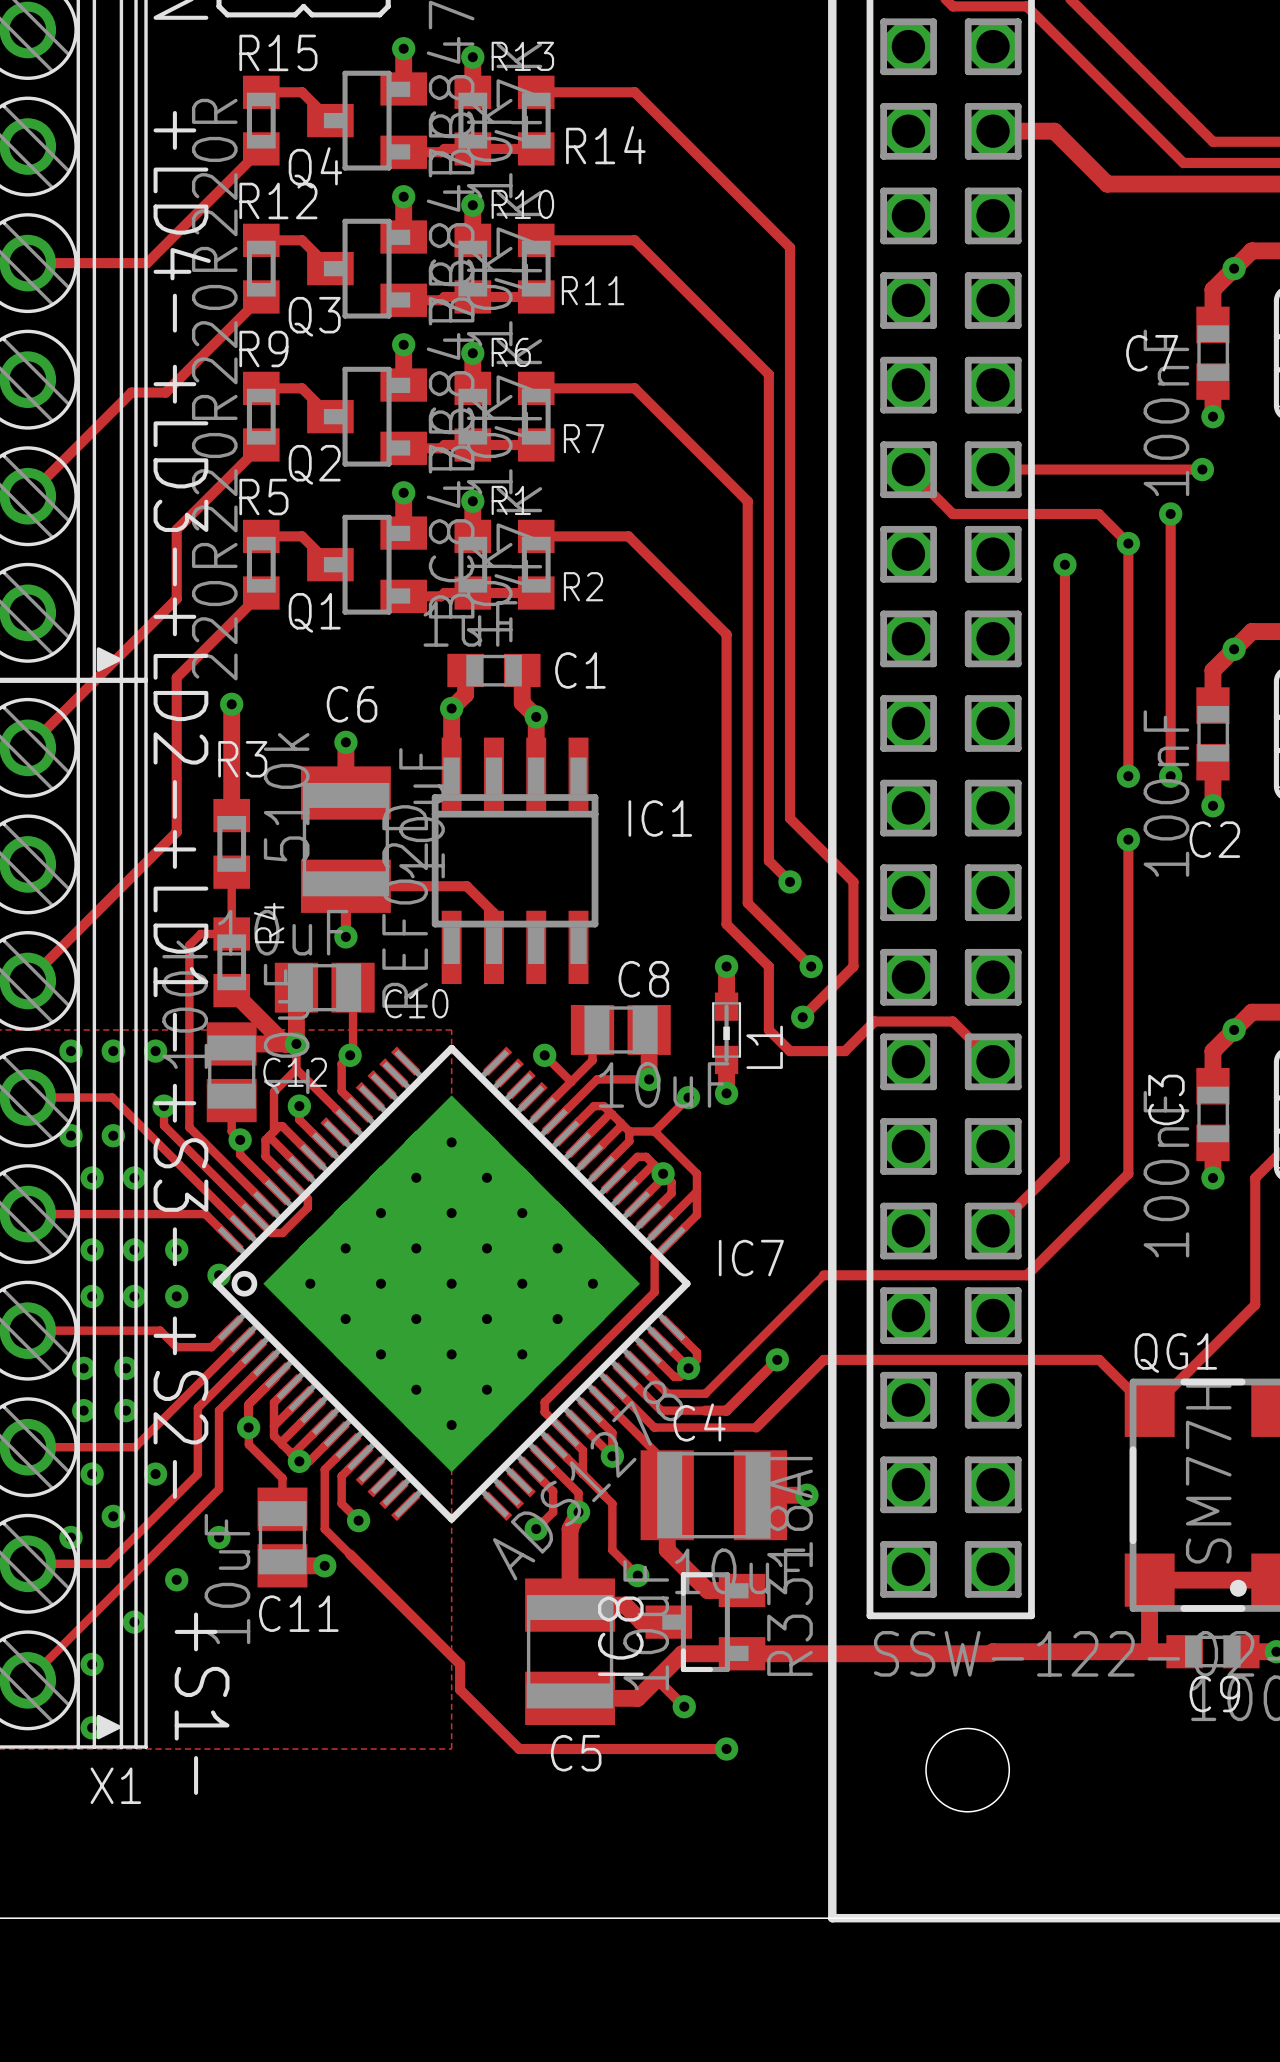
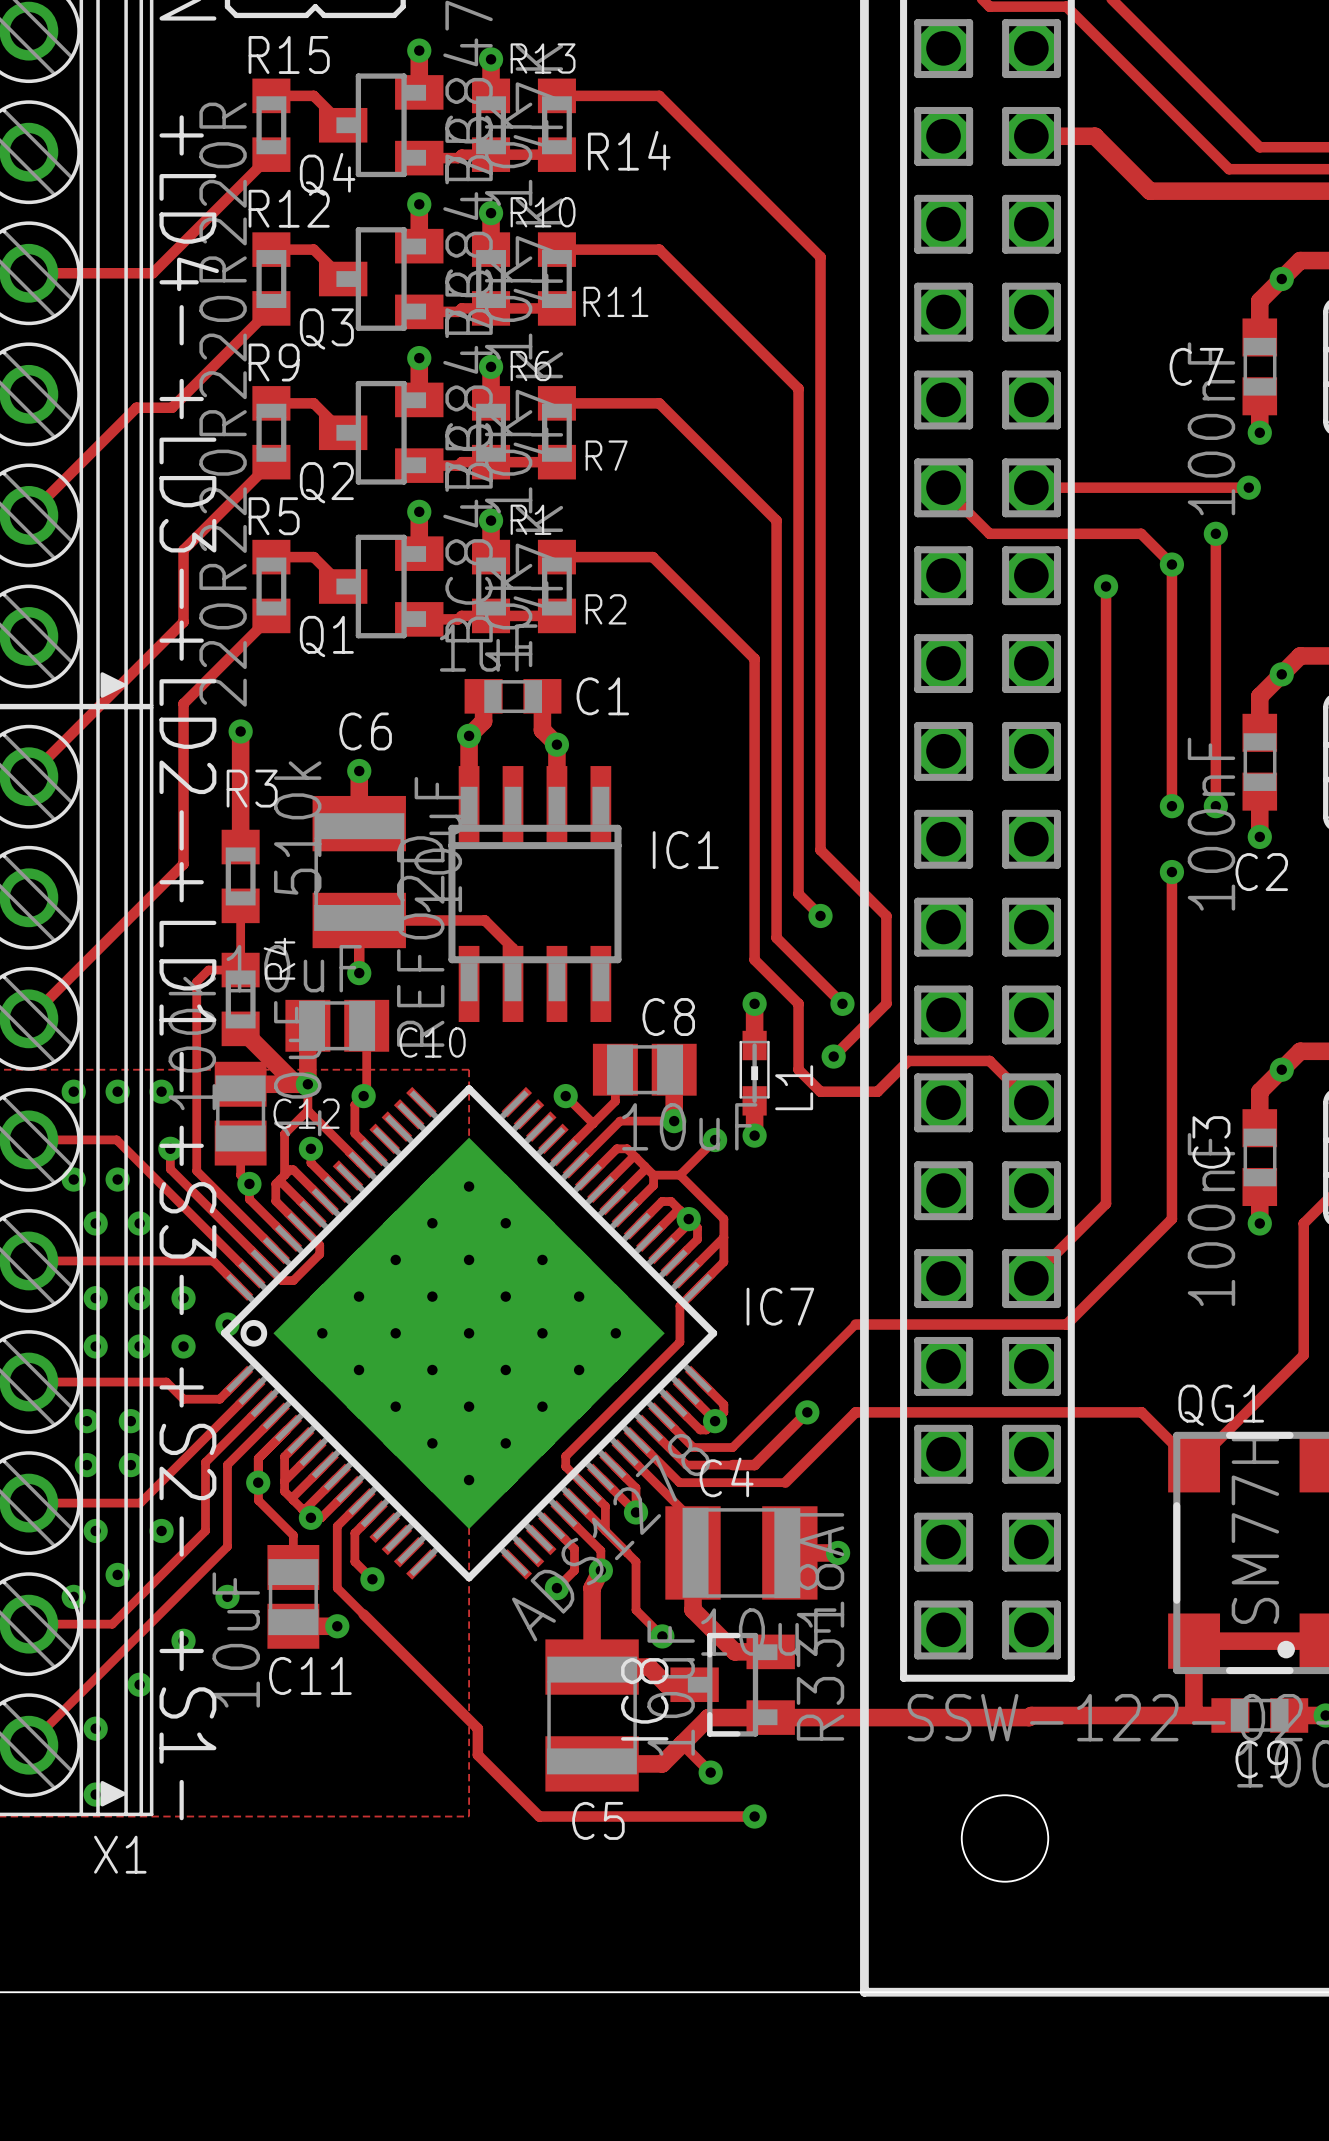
text position: +S1- (202, 1703) -> +S1- (187, 1725)

